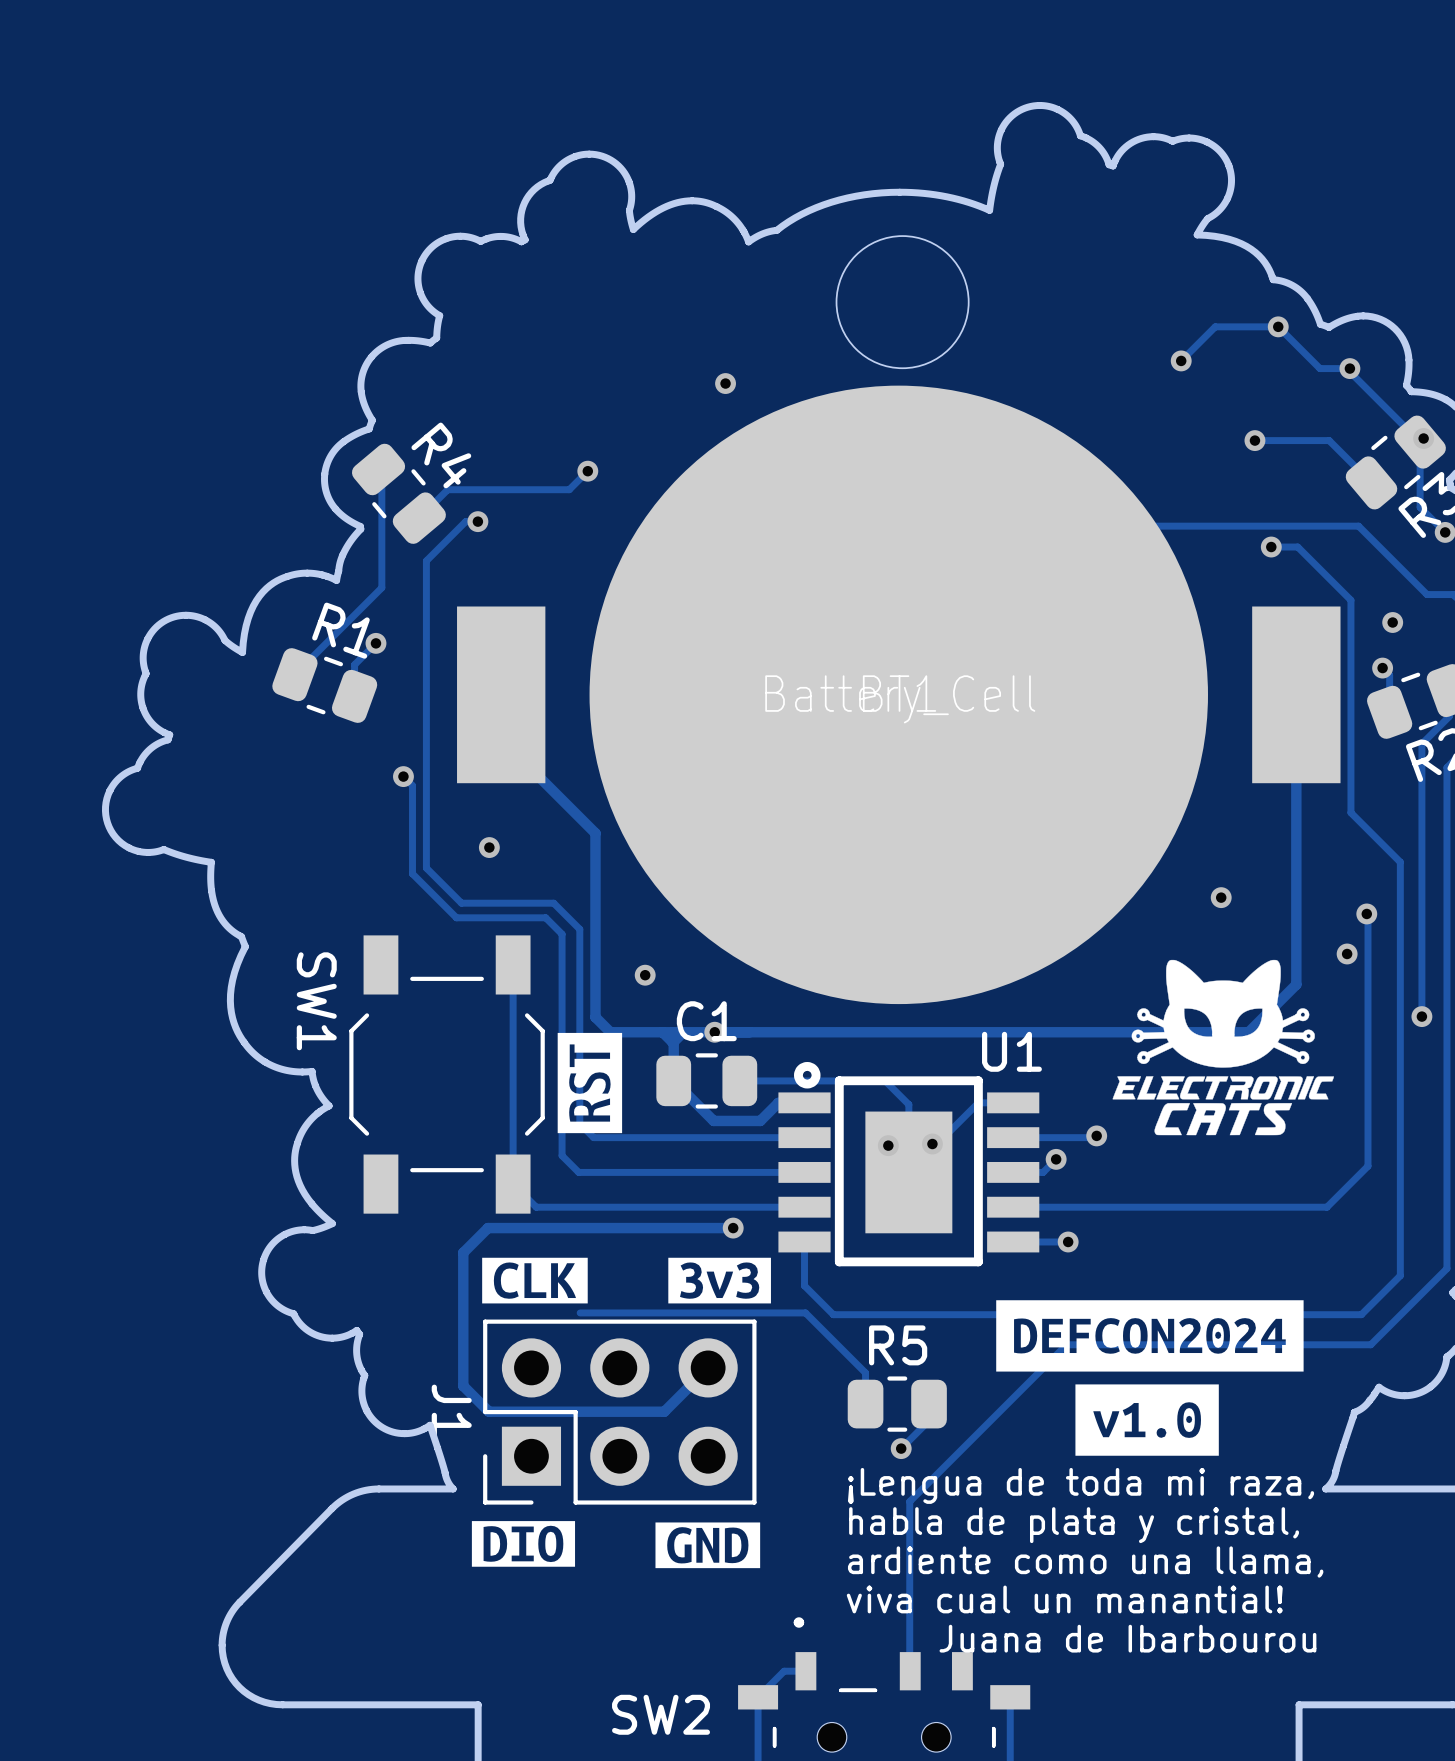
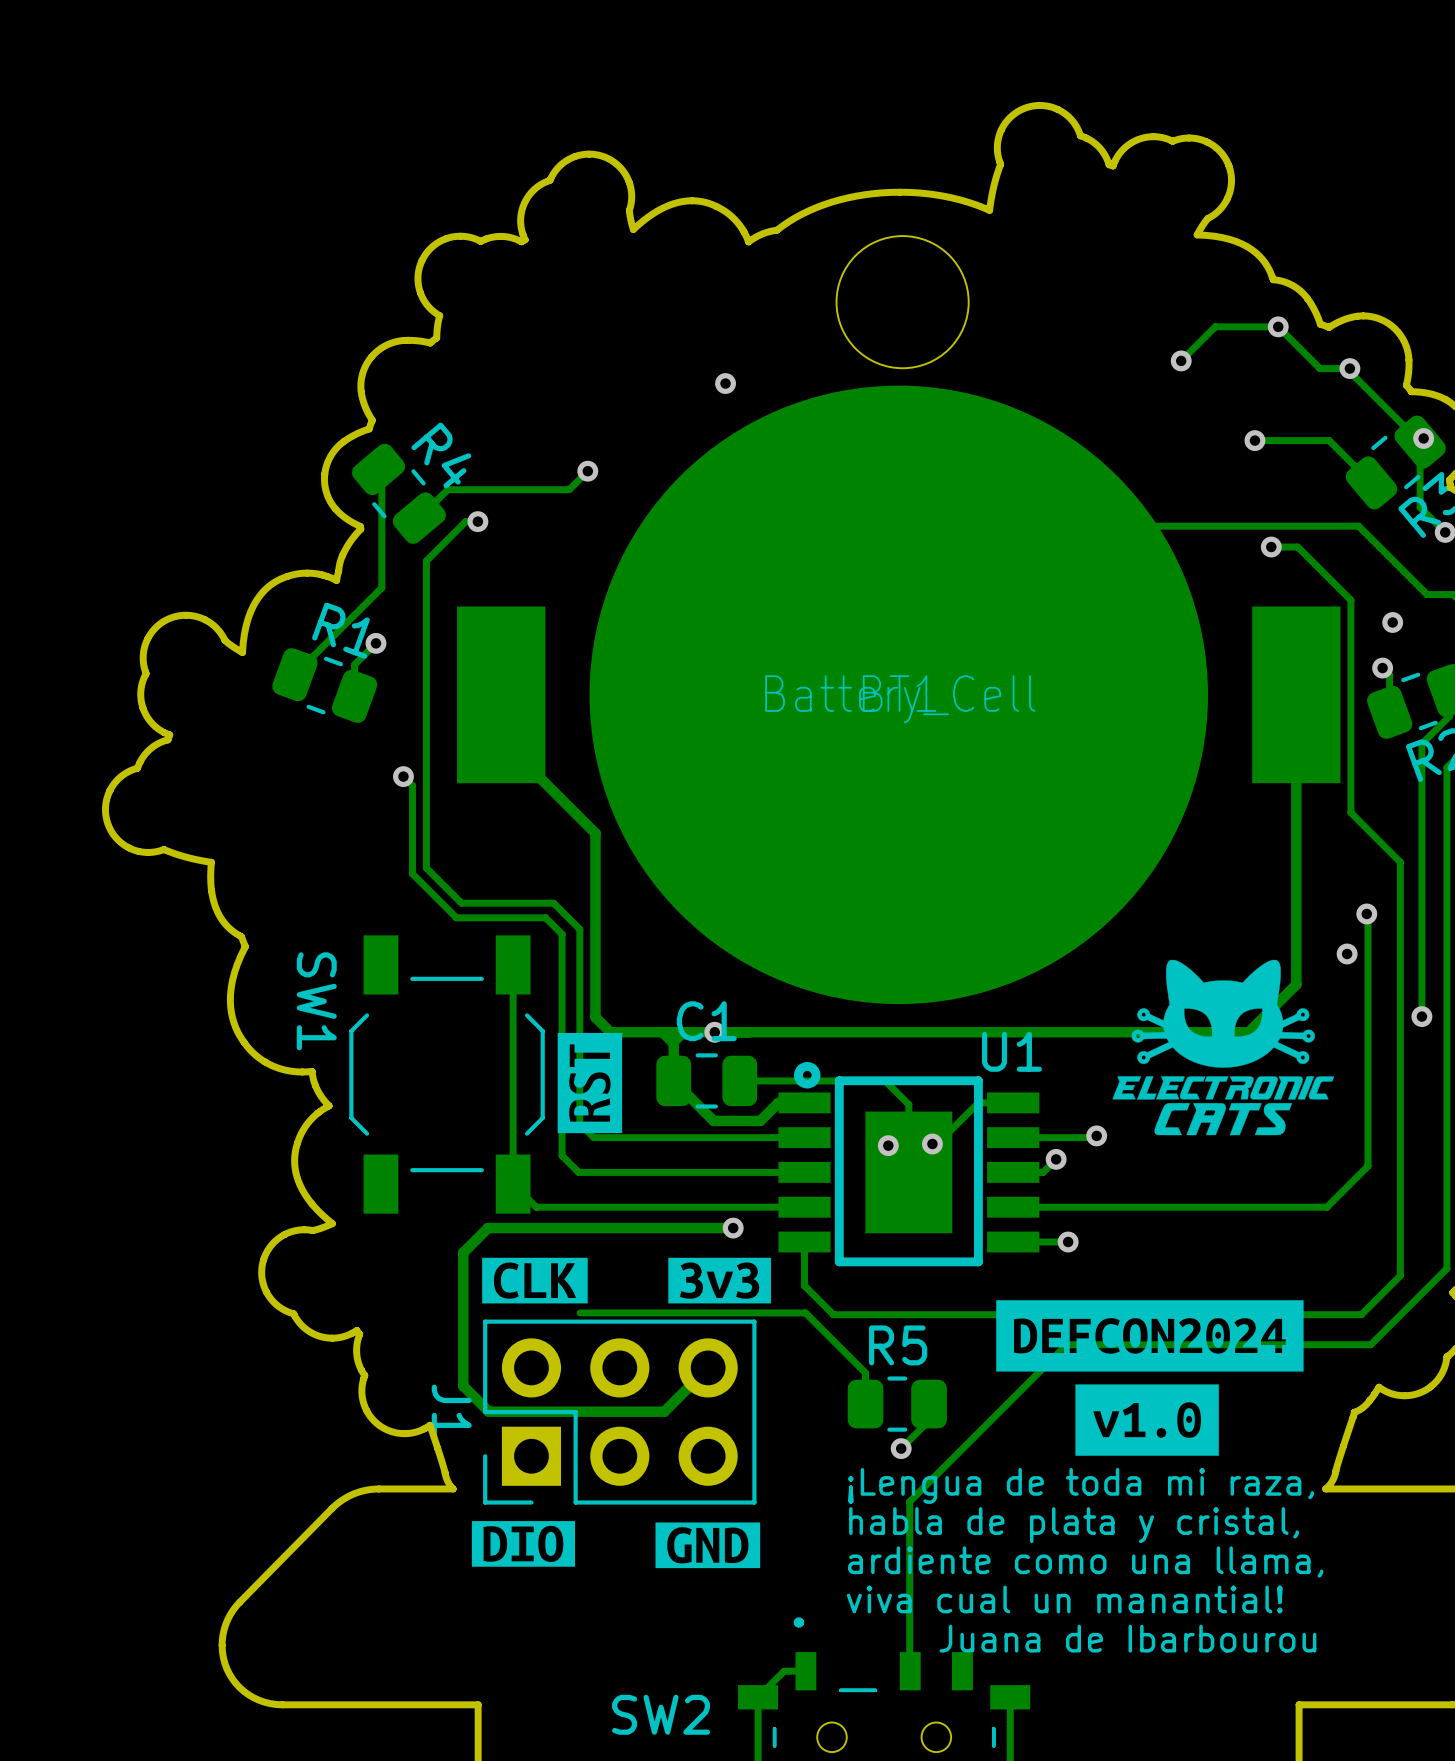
via: (489, 847) -> none
via: (1221, 897) -> none
via: (645, 975) -> none

